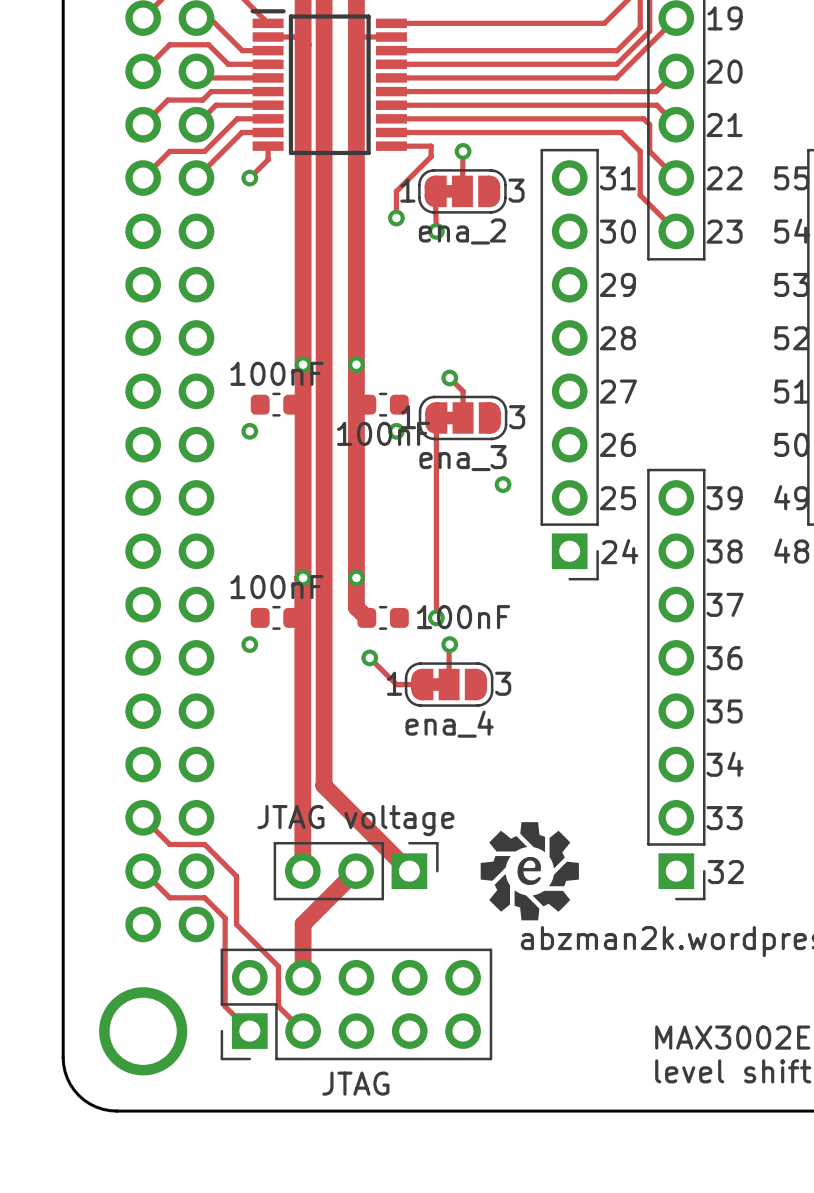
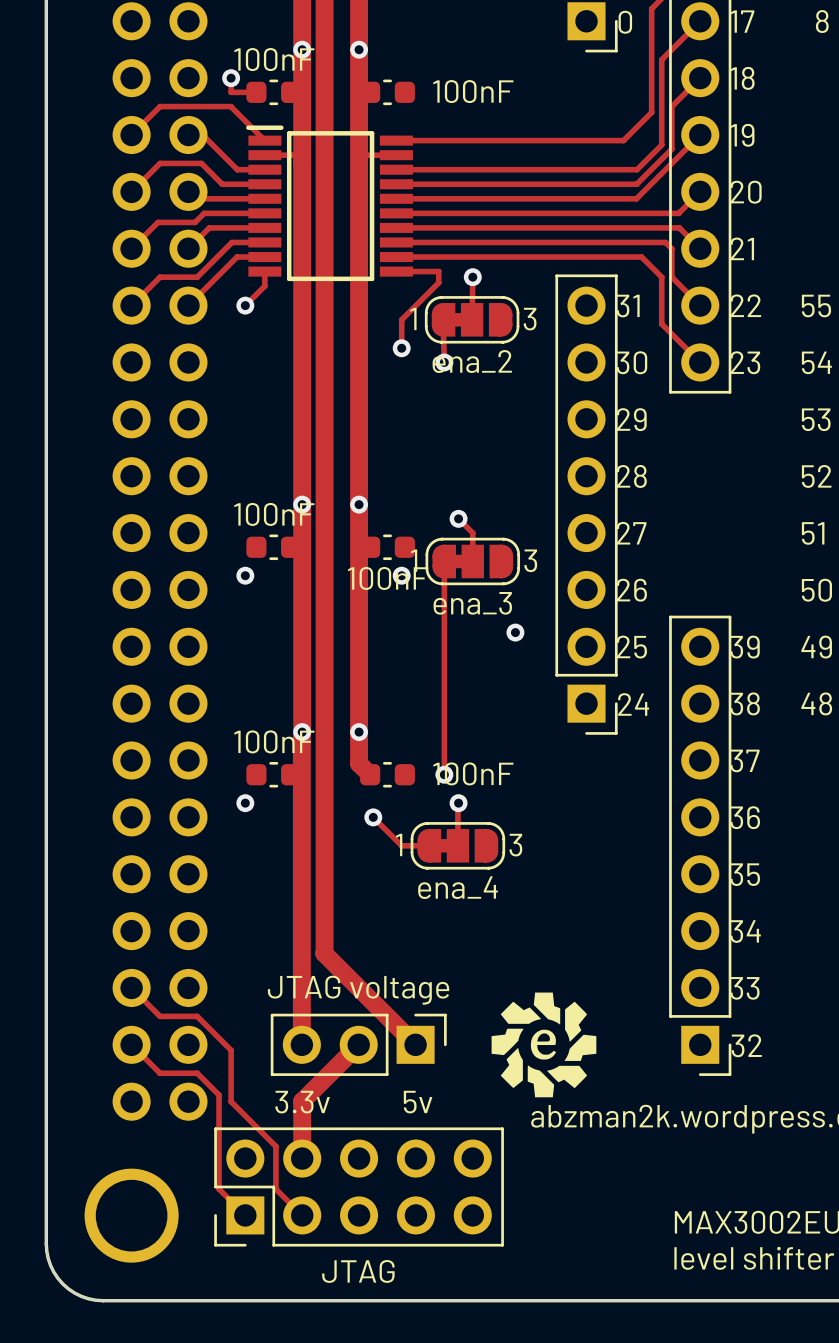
text: none -> 3.3v (302, 1102)
text: none -> 5v (418, 1102)

